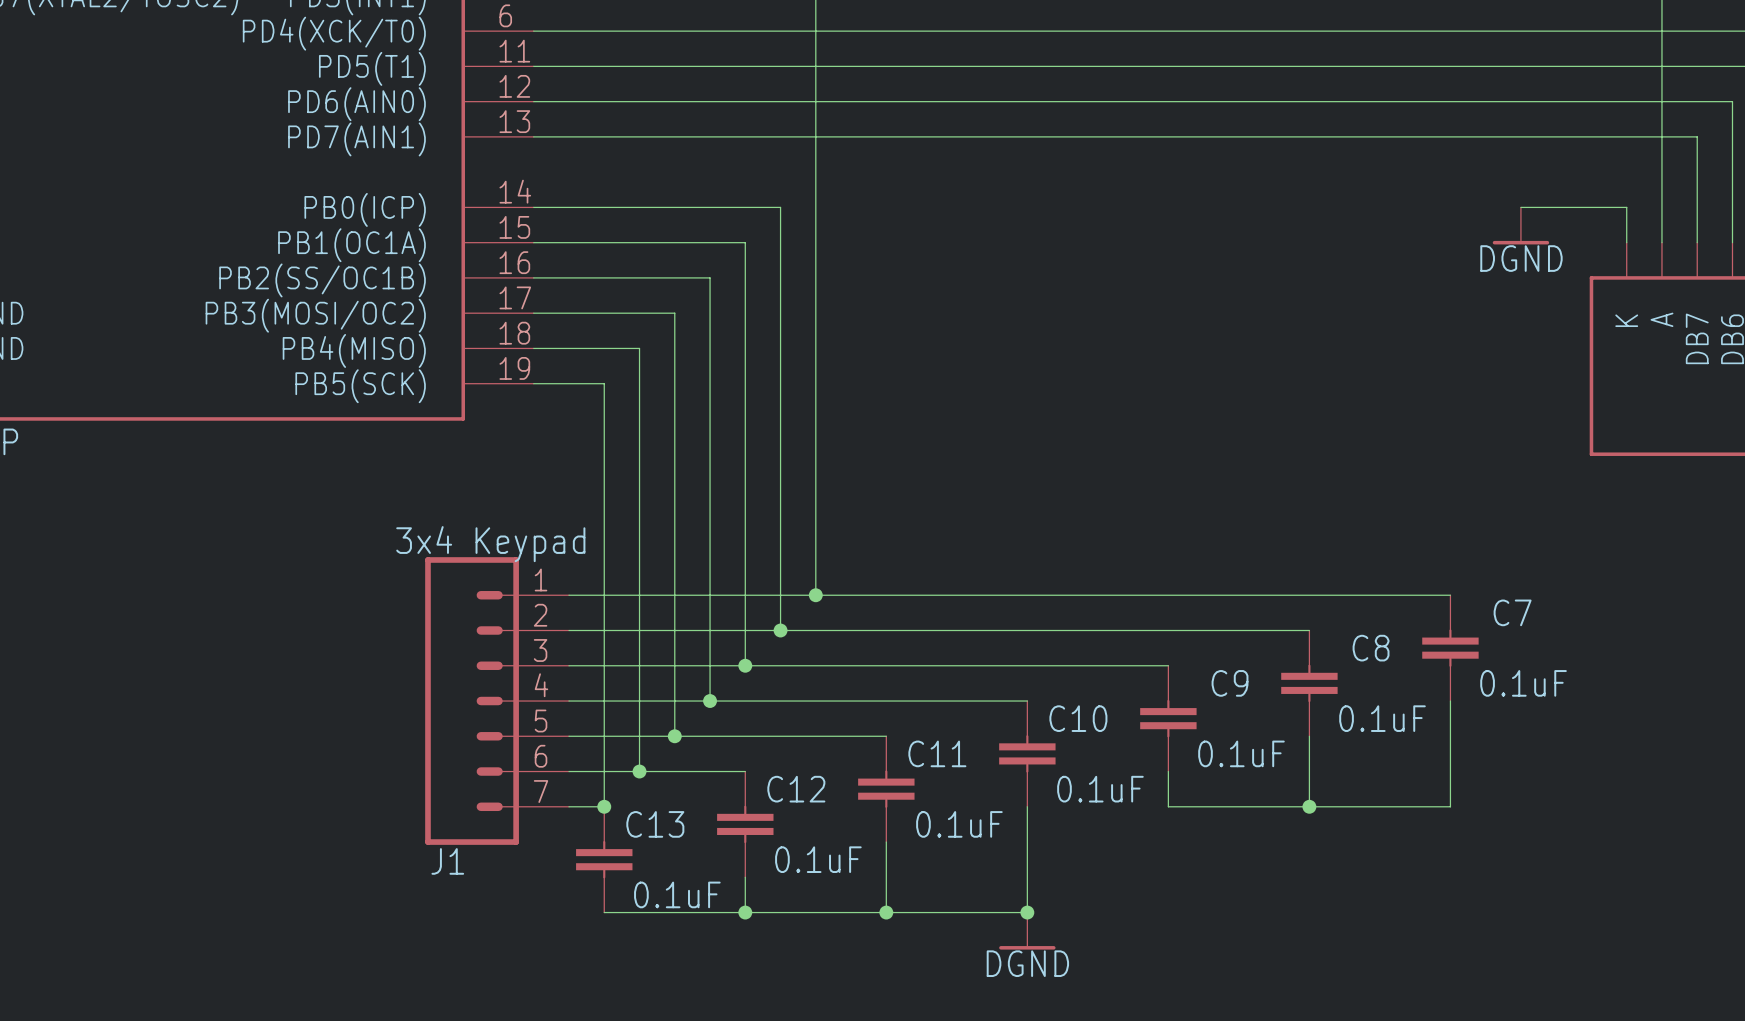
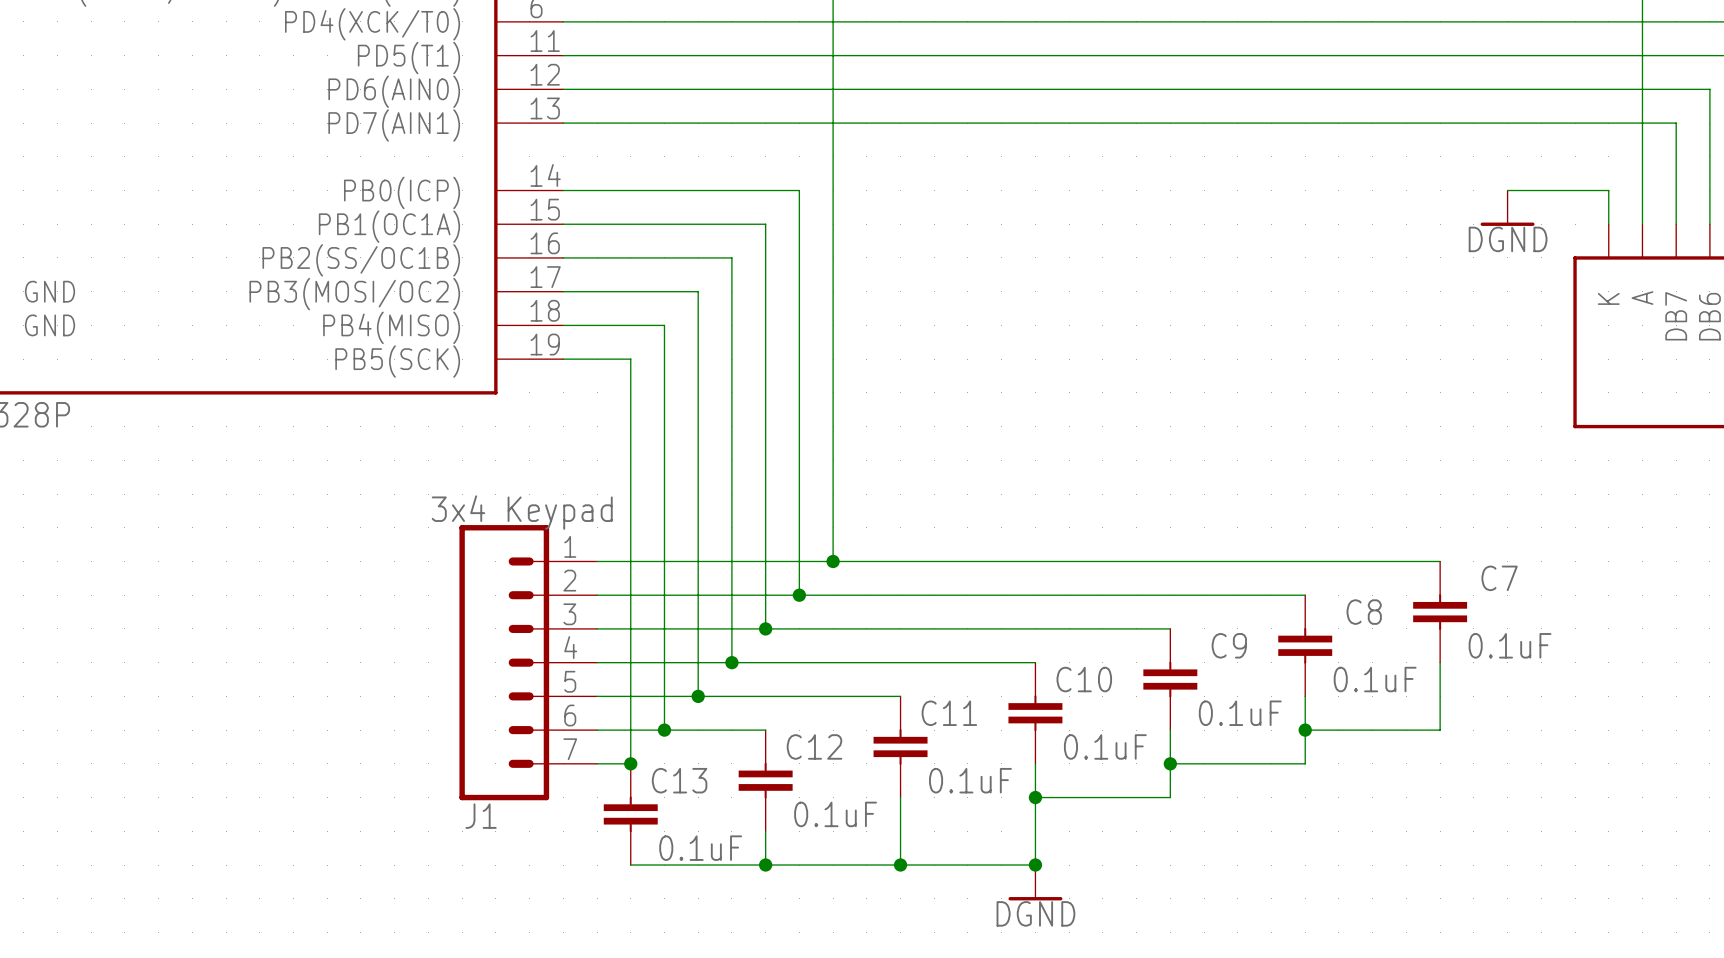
wire: (1450, 771) (1450, 806) (1309, 806) -> (1440, 730) (1305, 730)
wire: none -> (1170, 763) (1170, 797) (1035, 797)
junction: none -> (1170, 763)
junction position: (1309, 806) -> (1305, 730)
junction: none -> (1035, 797)

